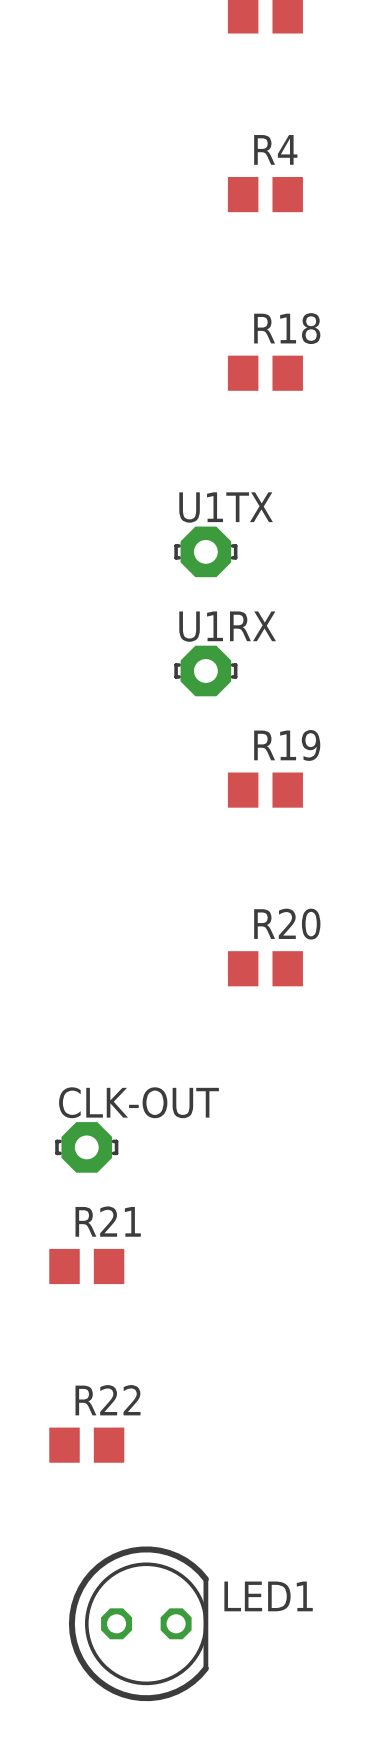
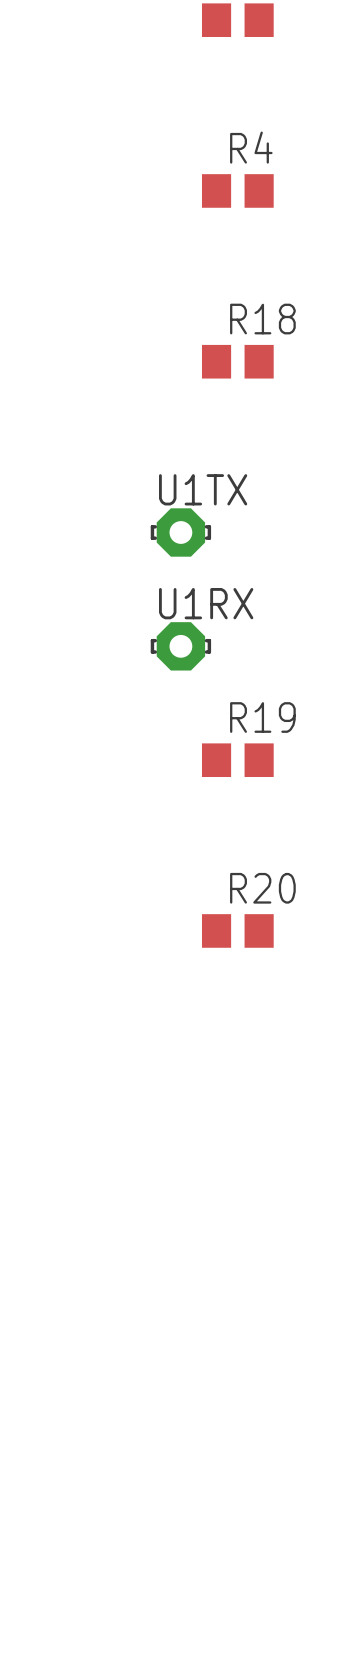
CLK-OUT: (86, 1147) -> none
R21: (86, 1266) -> none
R22: (86, 1445) -> none
LED1: (138, 1623) -> none

